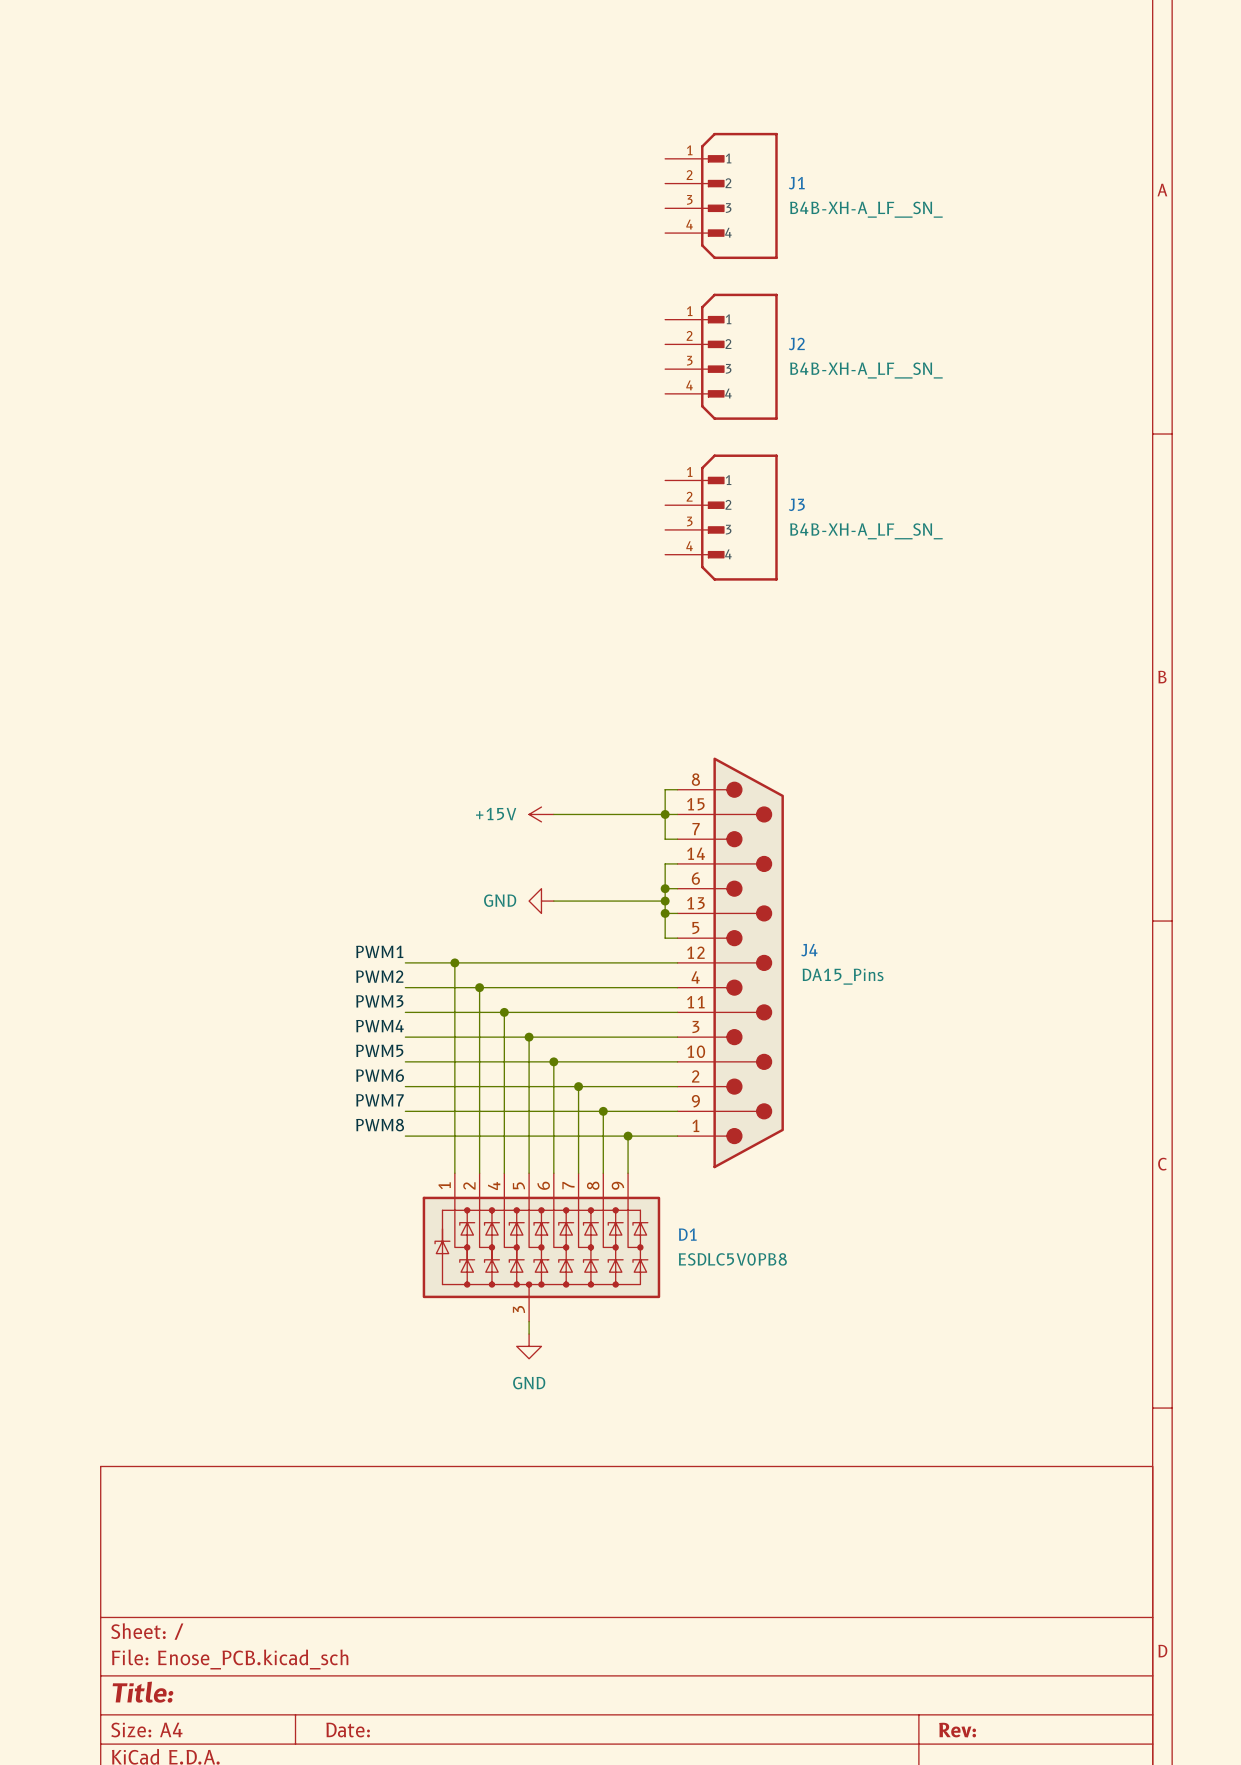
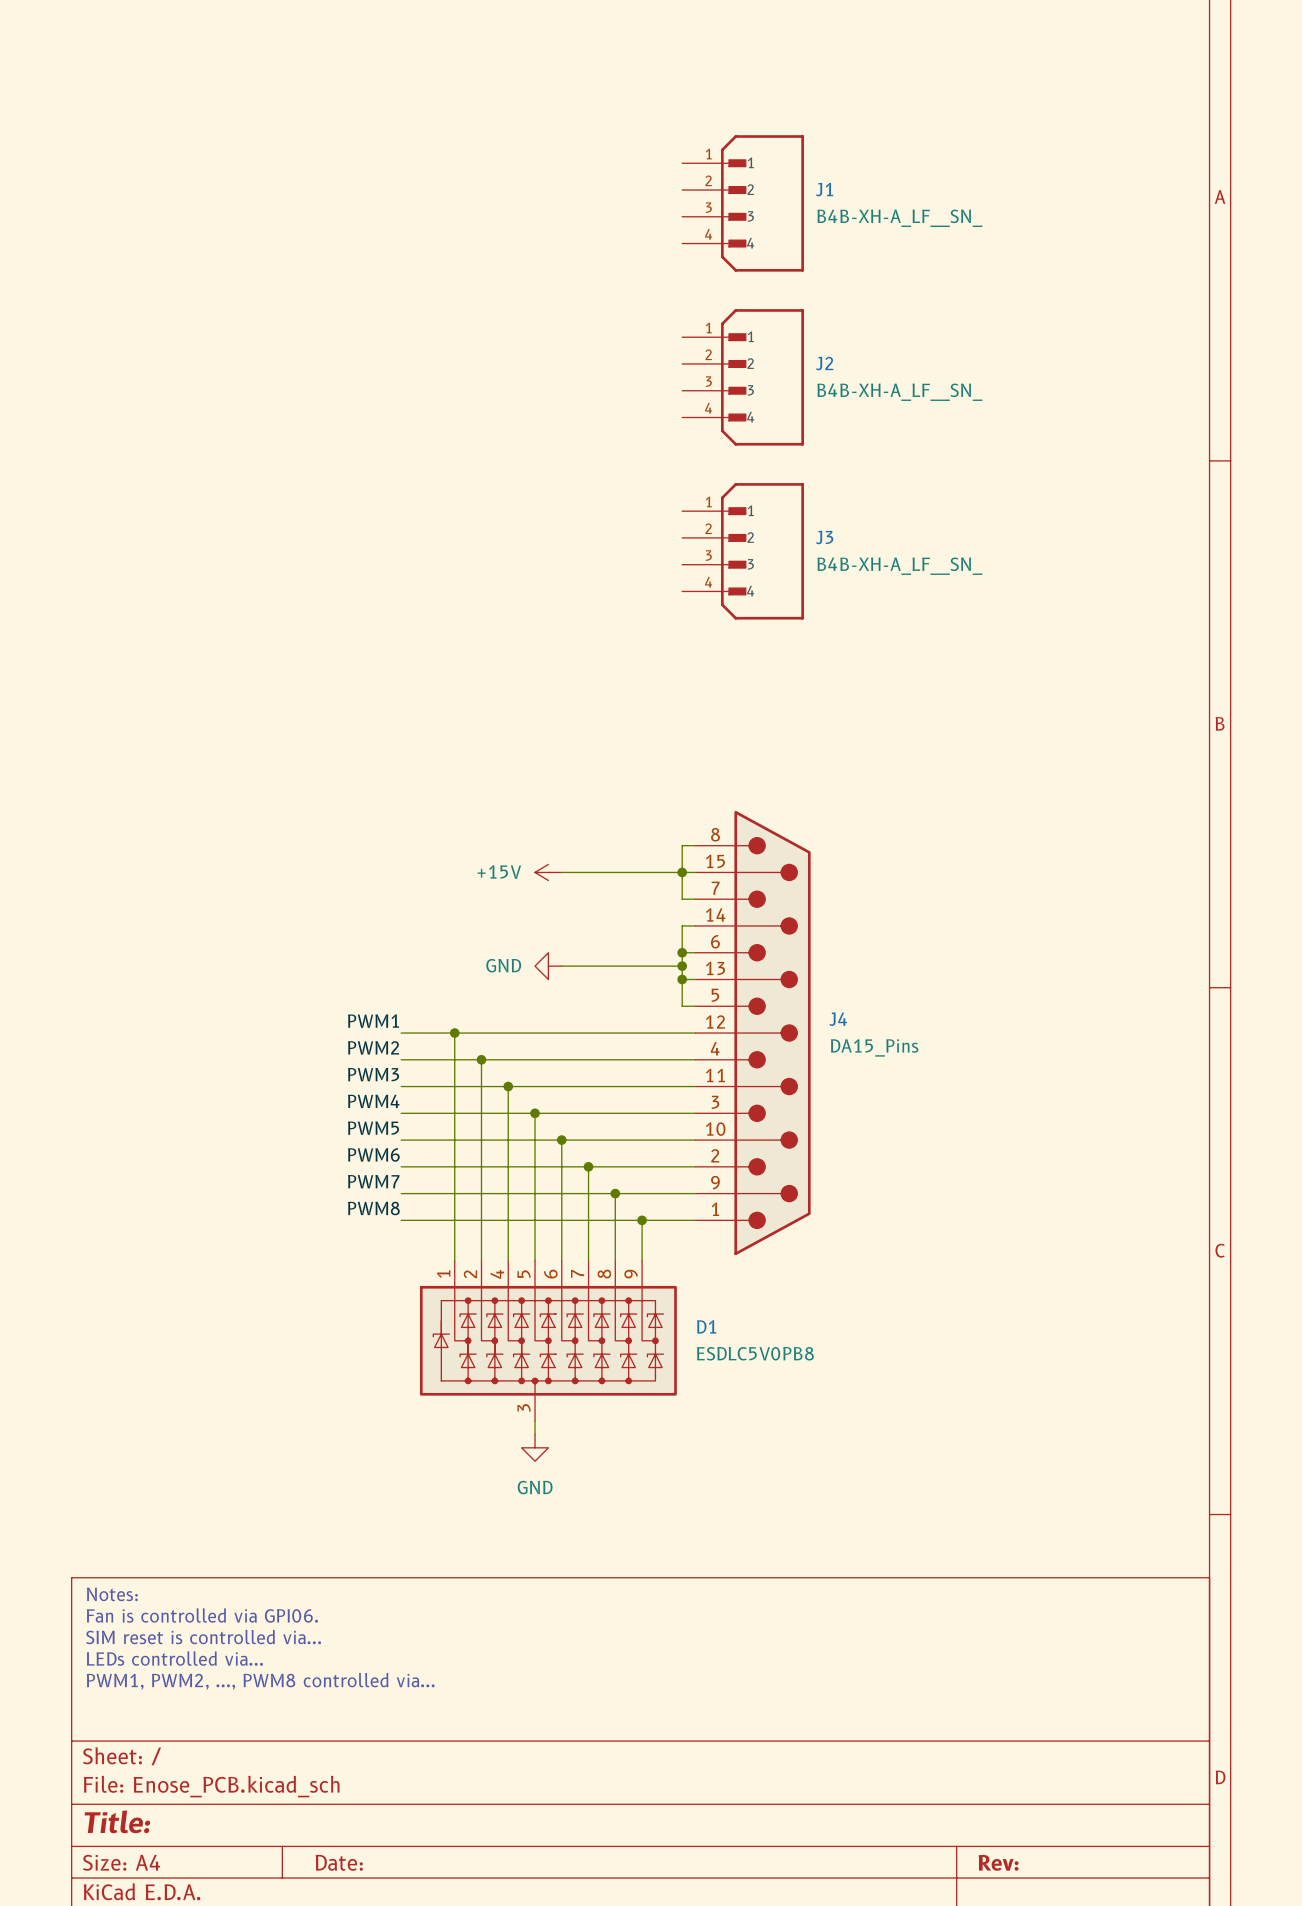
text: none -> Notes: (112, 1594)
text: none -> Fan is controlled via GPI06. (202, 1615)
text: none -> SIM reset is controlled via... (203, 1637)
text: none -> LEDs controlled via... (174, 1658)
text: none -> PWM1, PWM2, ..., PWM8 controlled via... (260, 1681)

